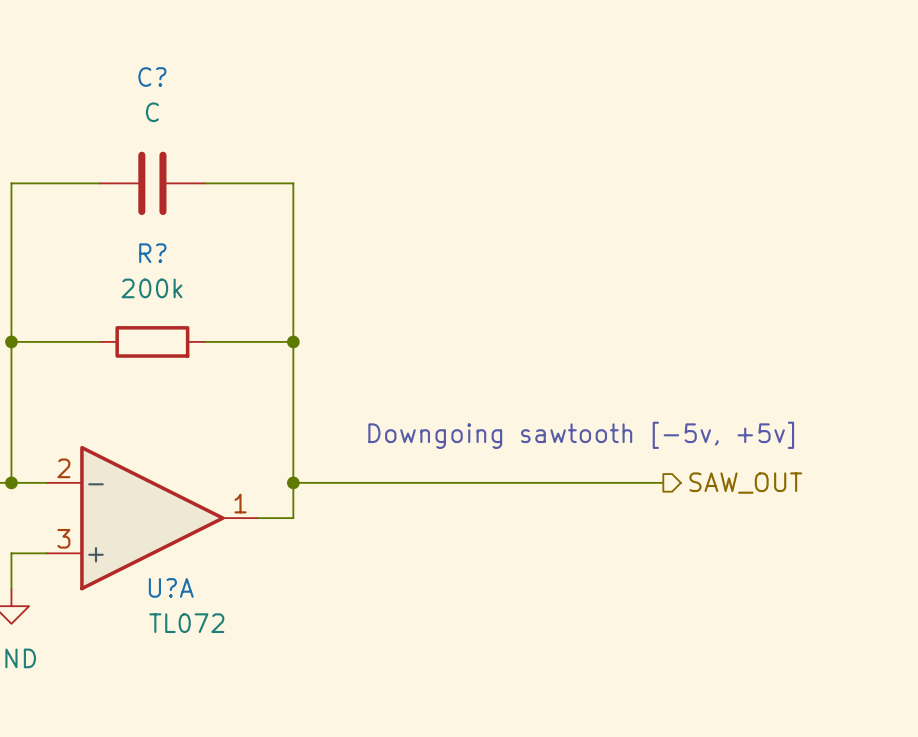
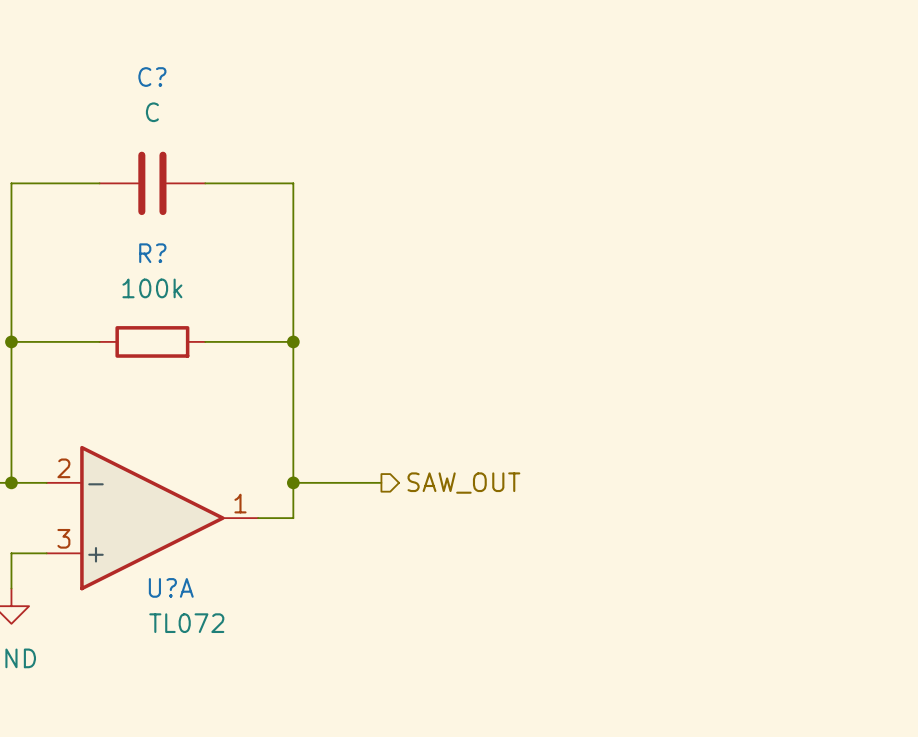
R? value: 200k (151, 288) -> 100k (152, 288)
text: Downgoing sawtooth [-5v, +5v] (581, 435) -> none
wire: (381, 482) (663, 482) -> none
hierarchical label position: SAW_OUT (745, 483) -> SAW_OUT (463, 483)

